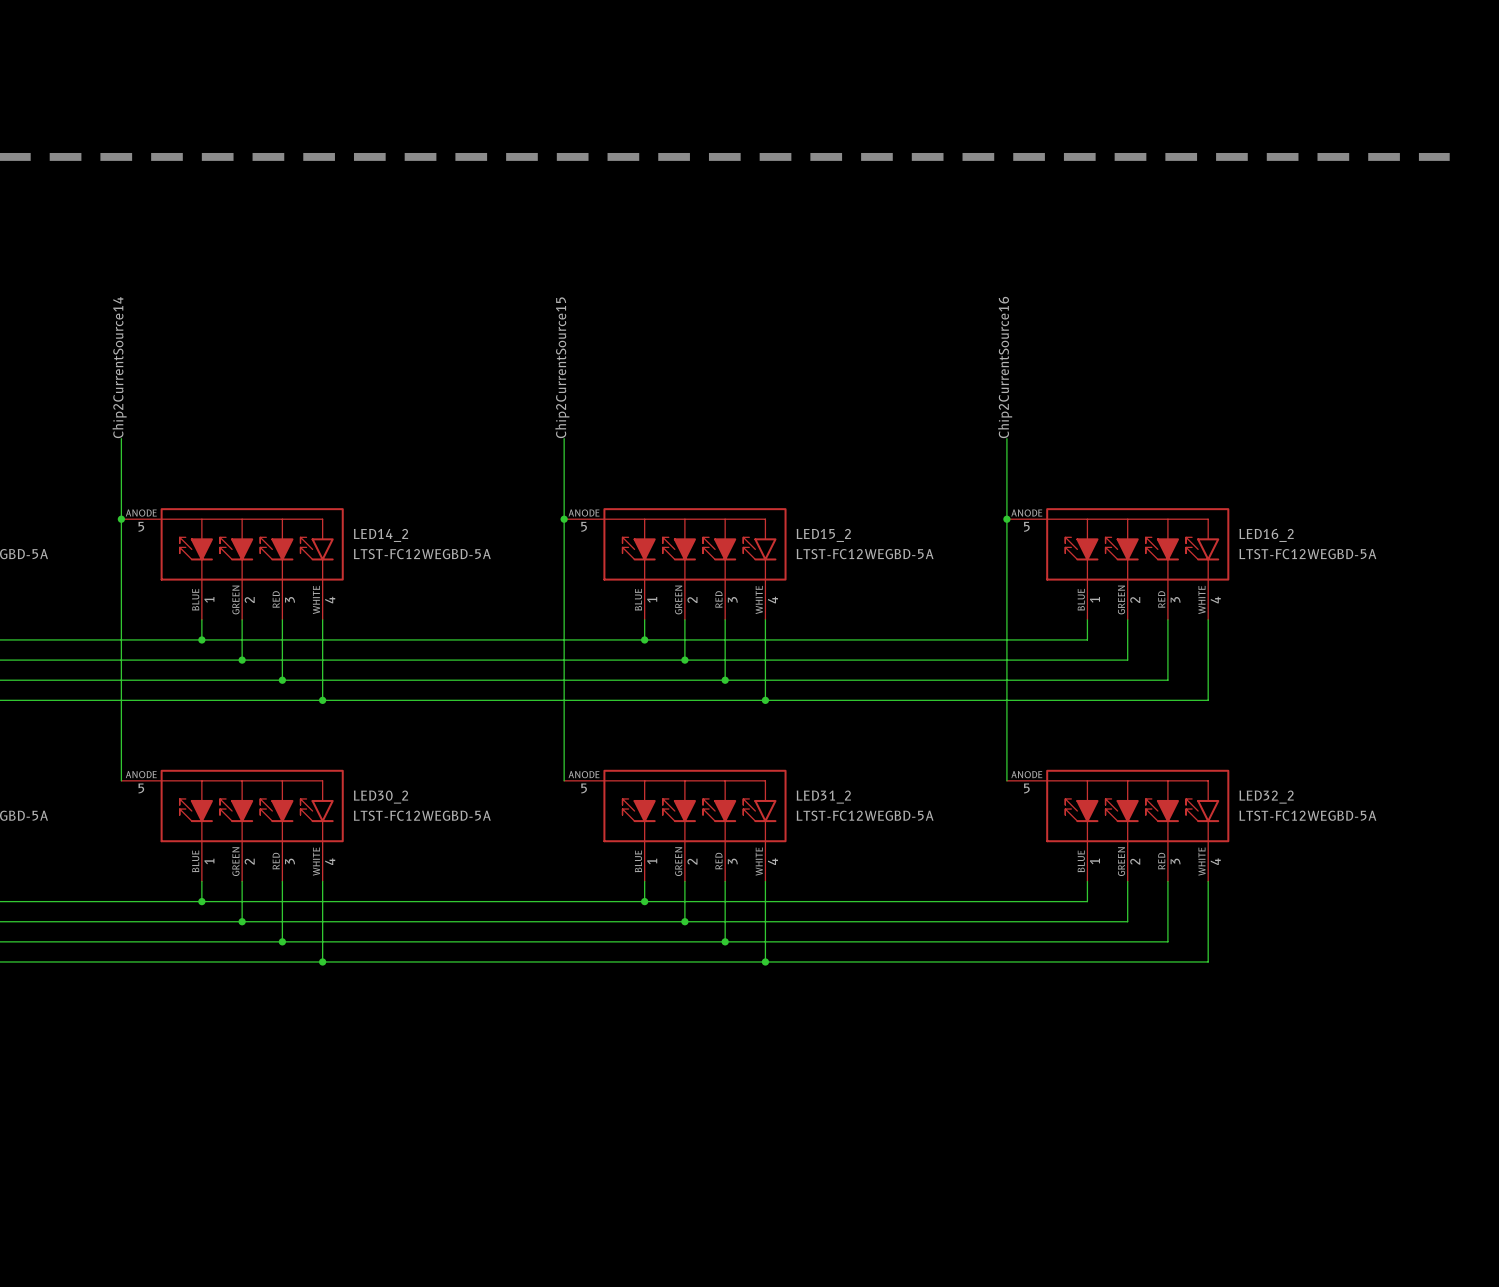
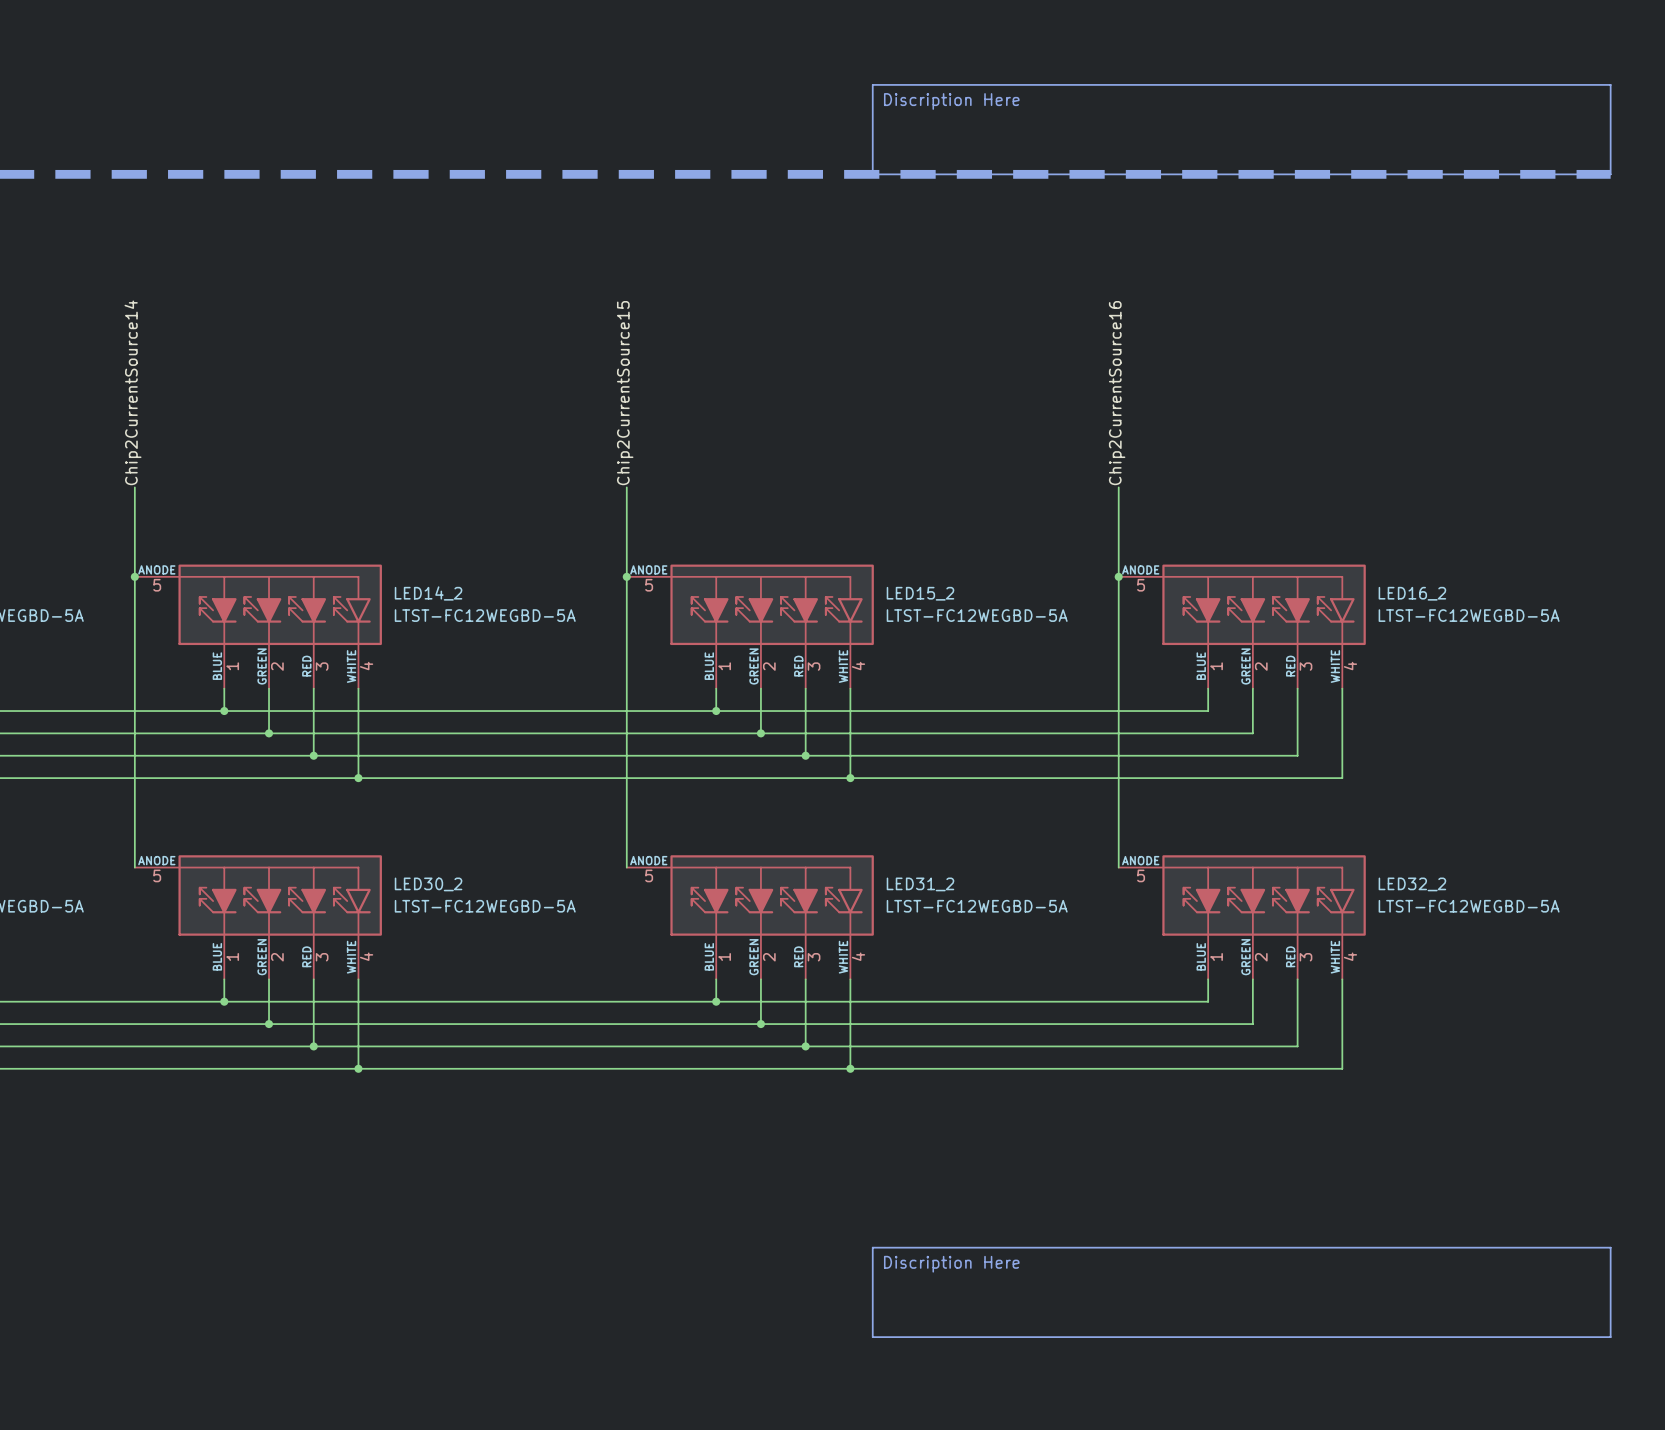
line: none -> (872, 84) (1610, 84) (1610, 174) (872, 174) (872, 84)
text: none -> Discription Here (951, 101)
line: none -> (872, 1247) (872, 1337) (1610, 1337) (1610, 1247) (872, 1247)
text: none -> Discription Here (951, 1264)

